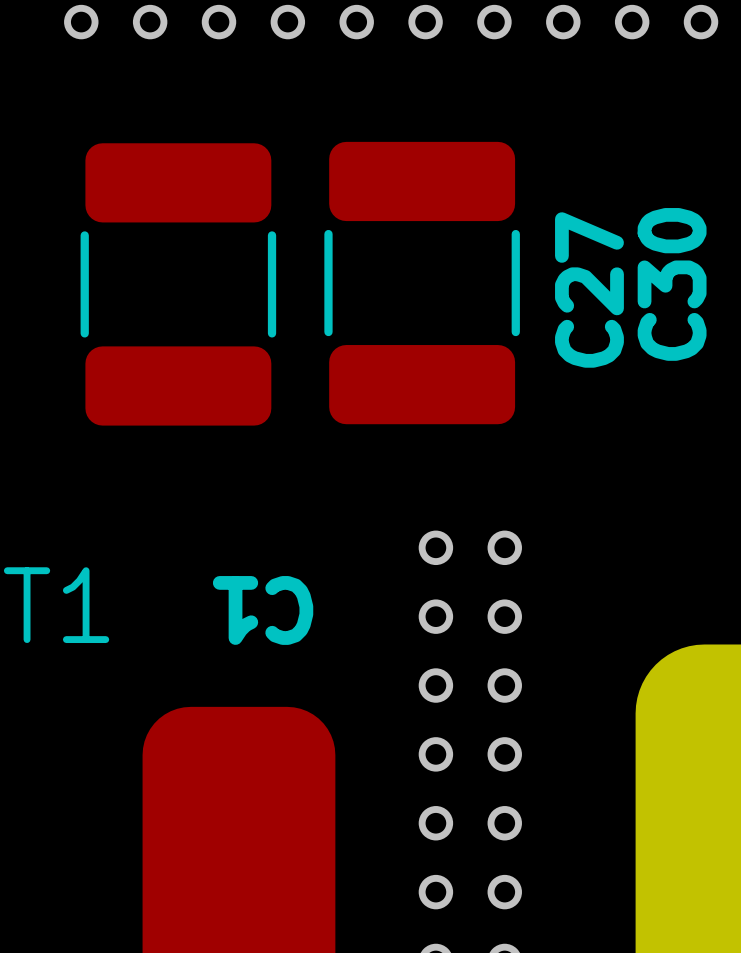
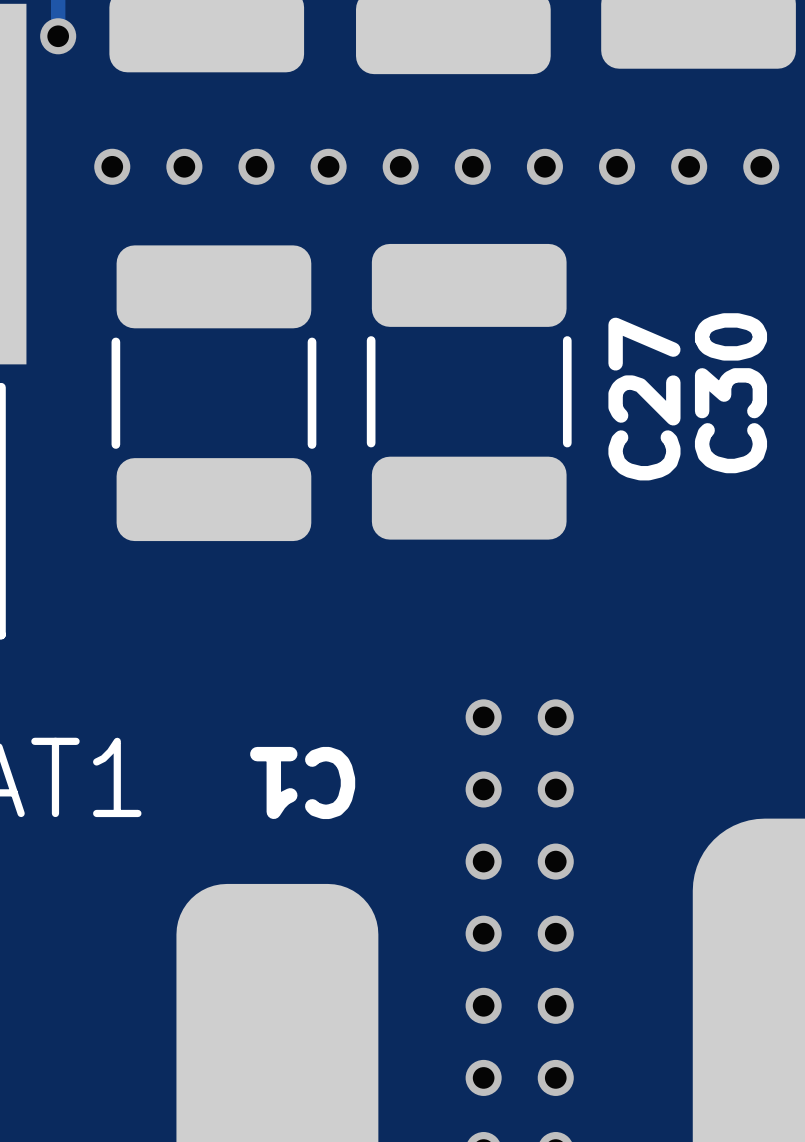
C30 position: (422, 283) -> (469, 391)
C27 position: (178, 284) -> (213, 393)

